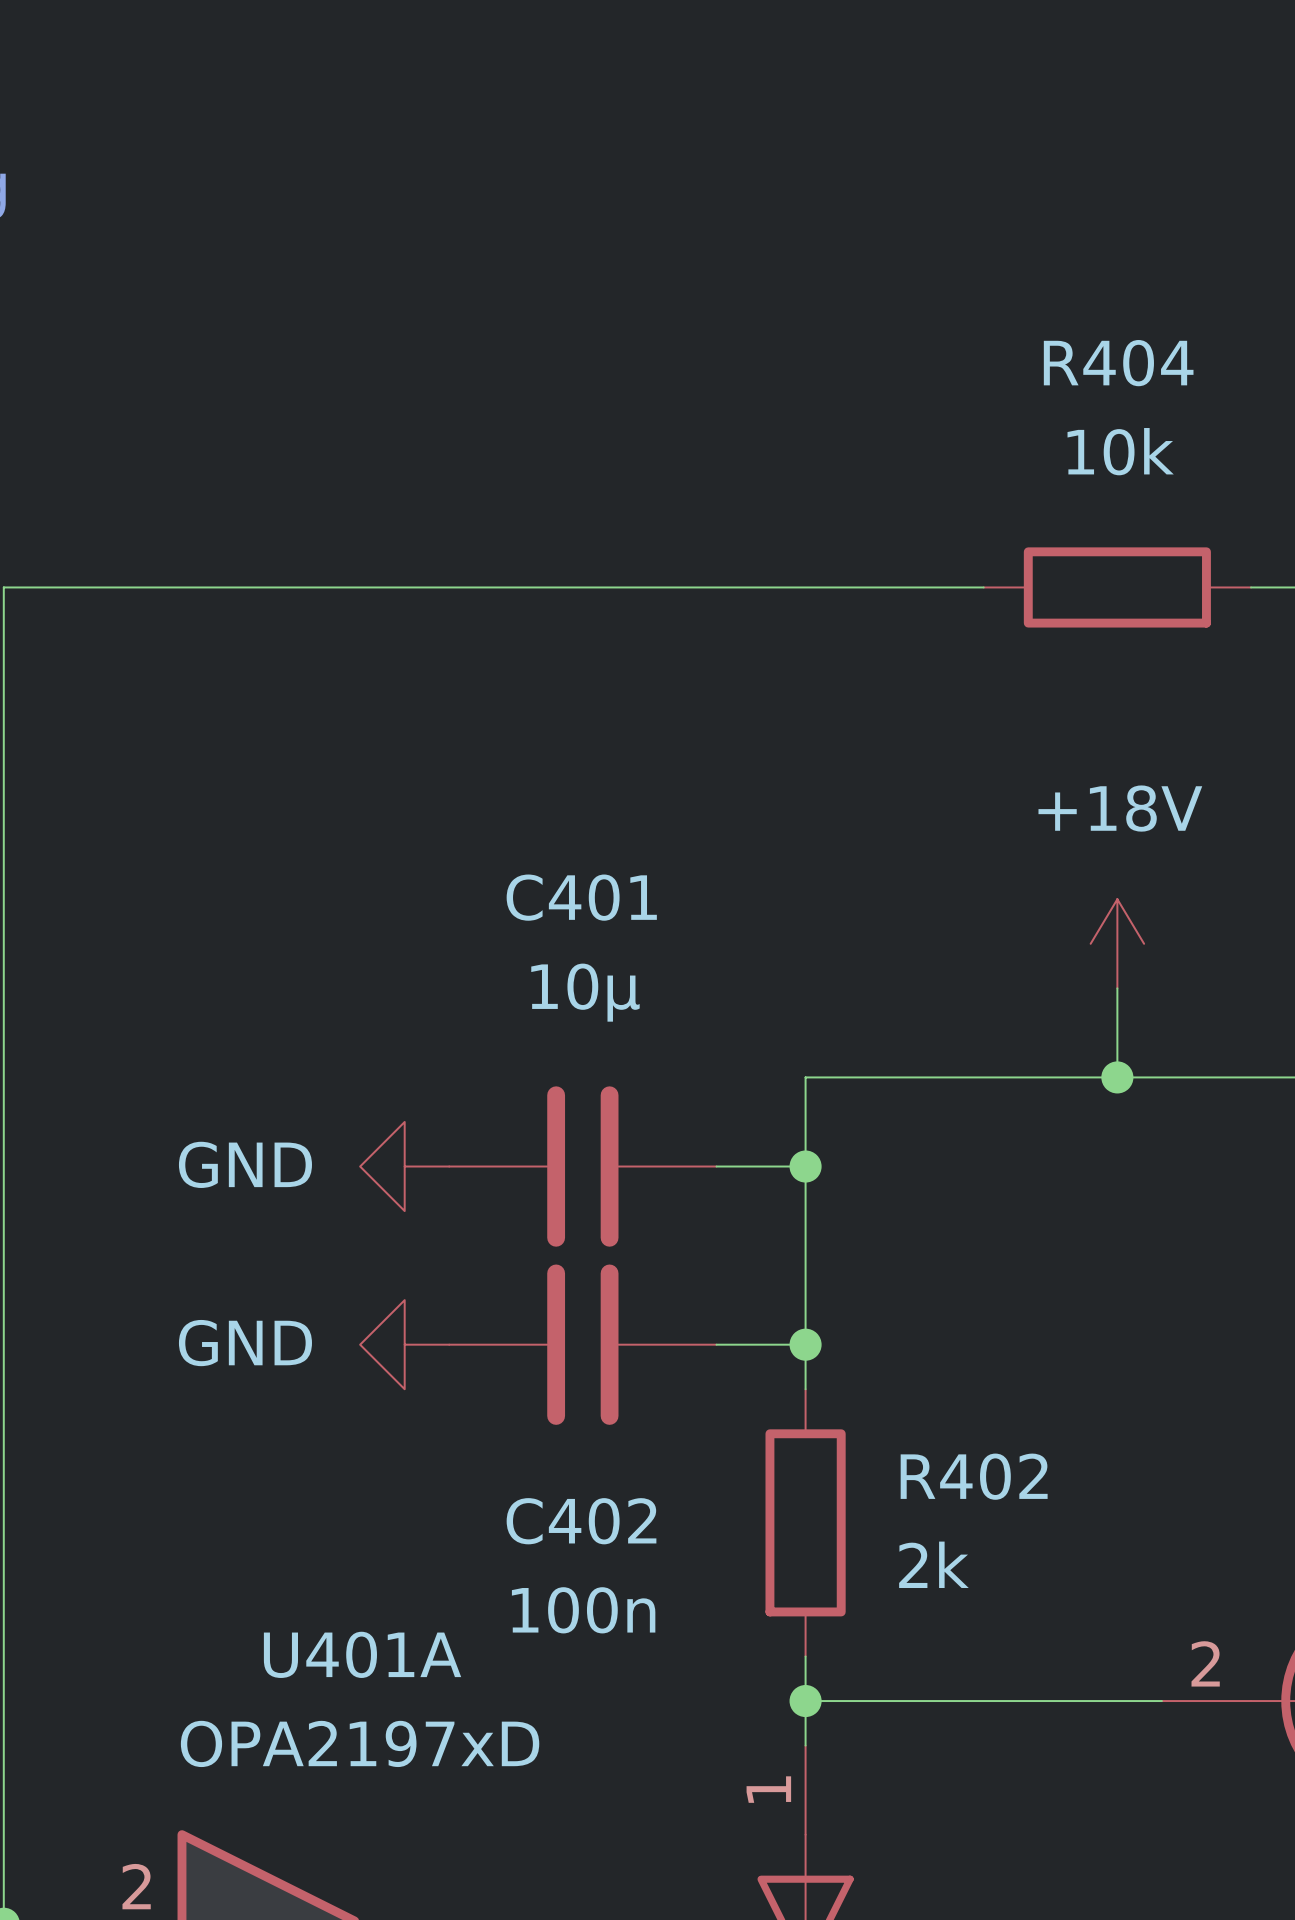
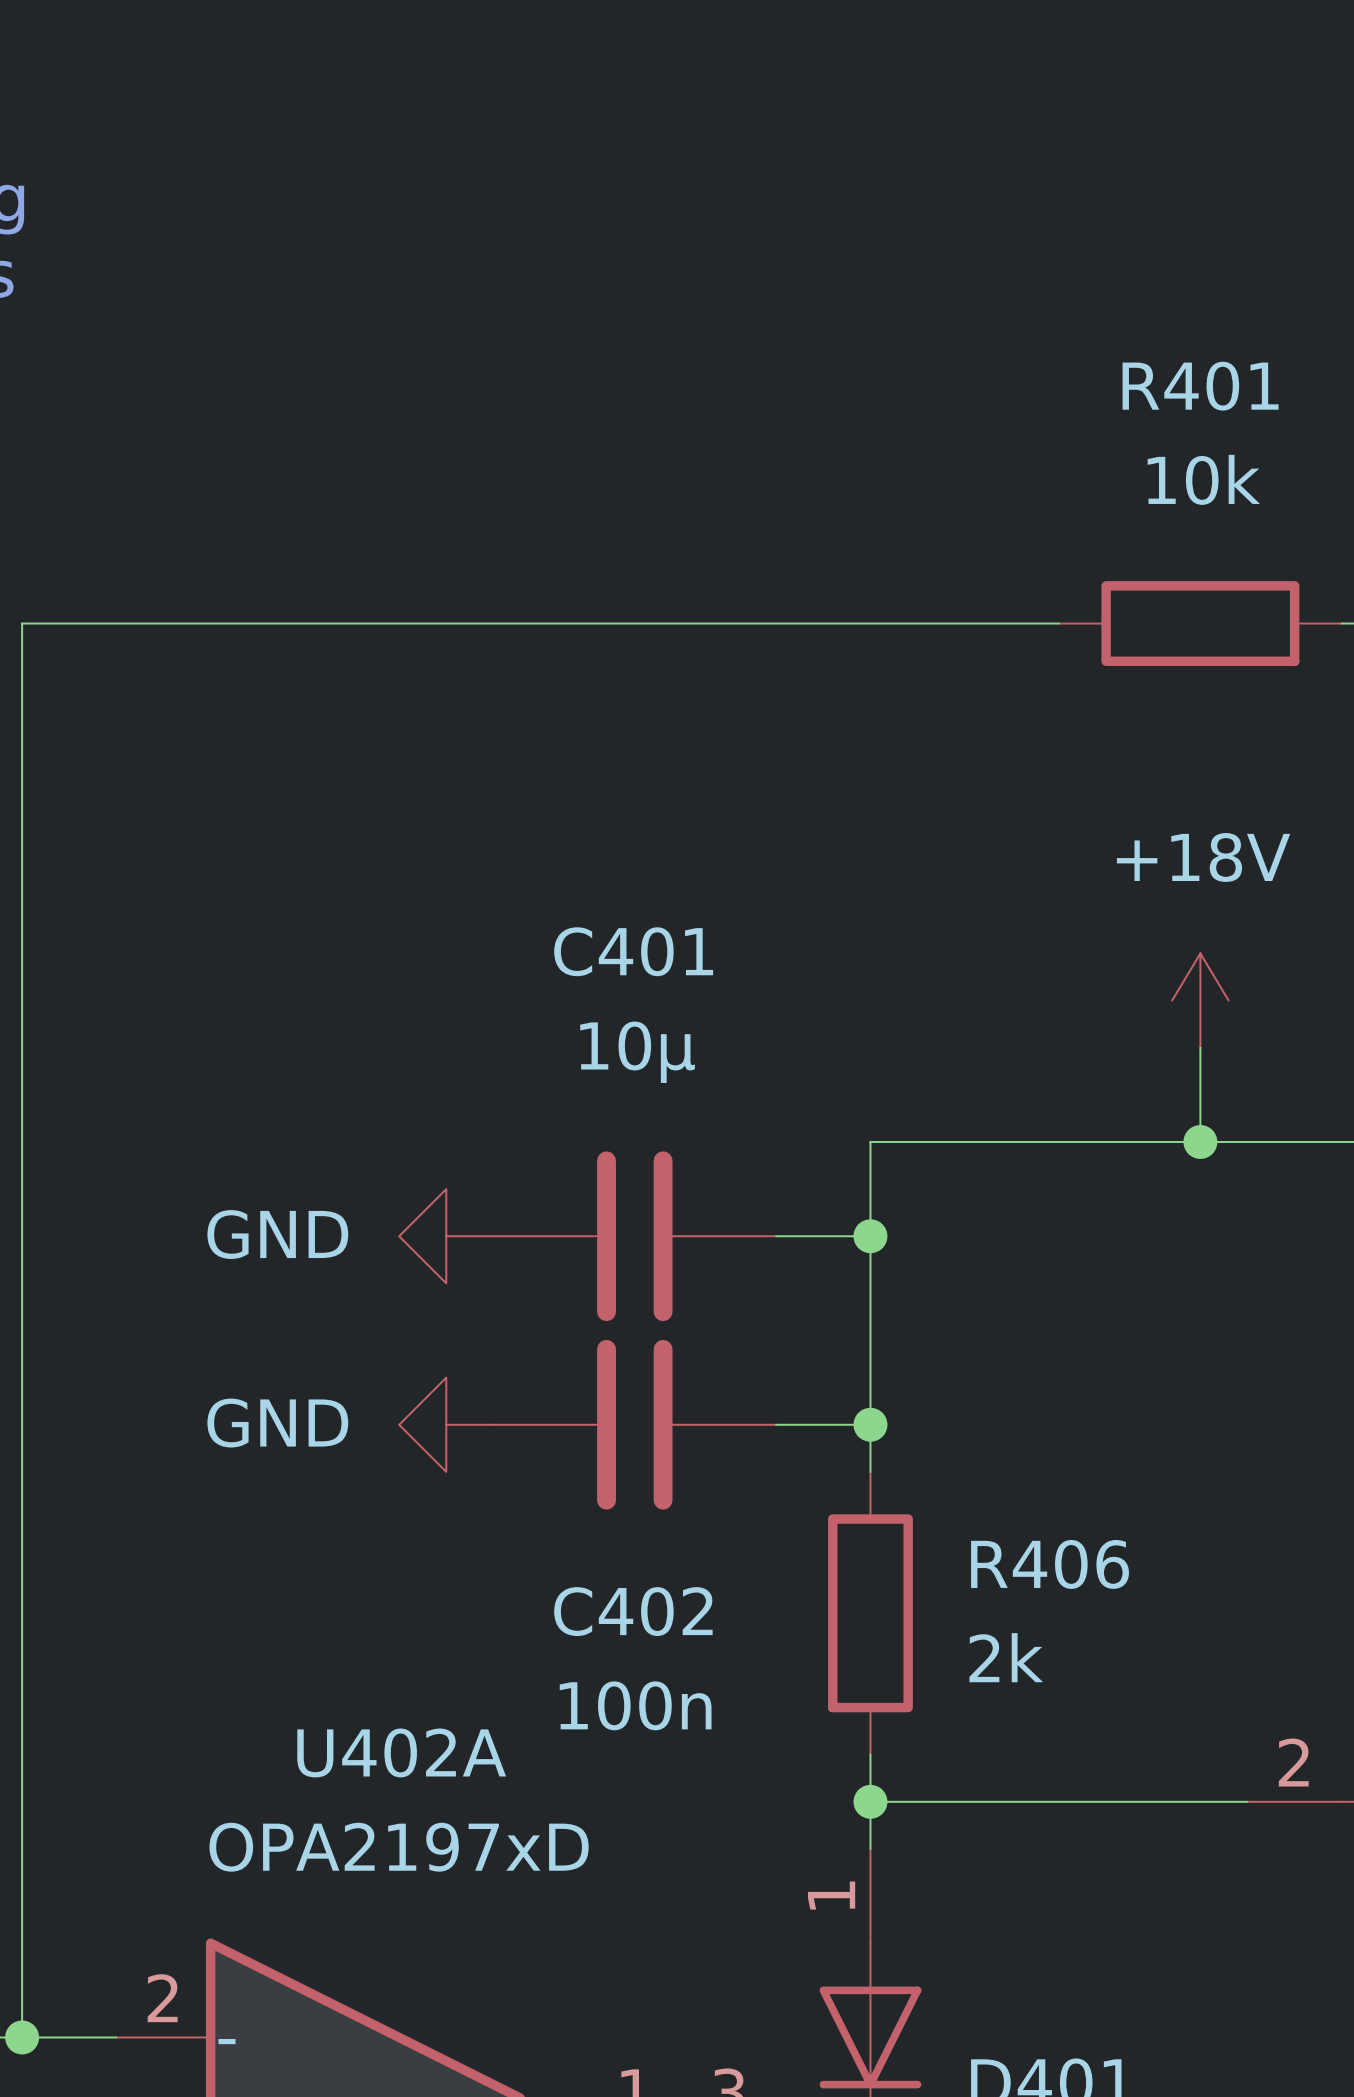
R404 name: R404 (1118, 363) -> R401 (1200, 386)
R402 name: R402 (974, 1476) -> R406 (1050, 1564)
U401A name: U401A (362, 1654) -> U402A (401, 1752)

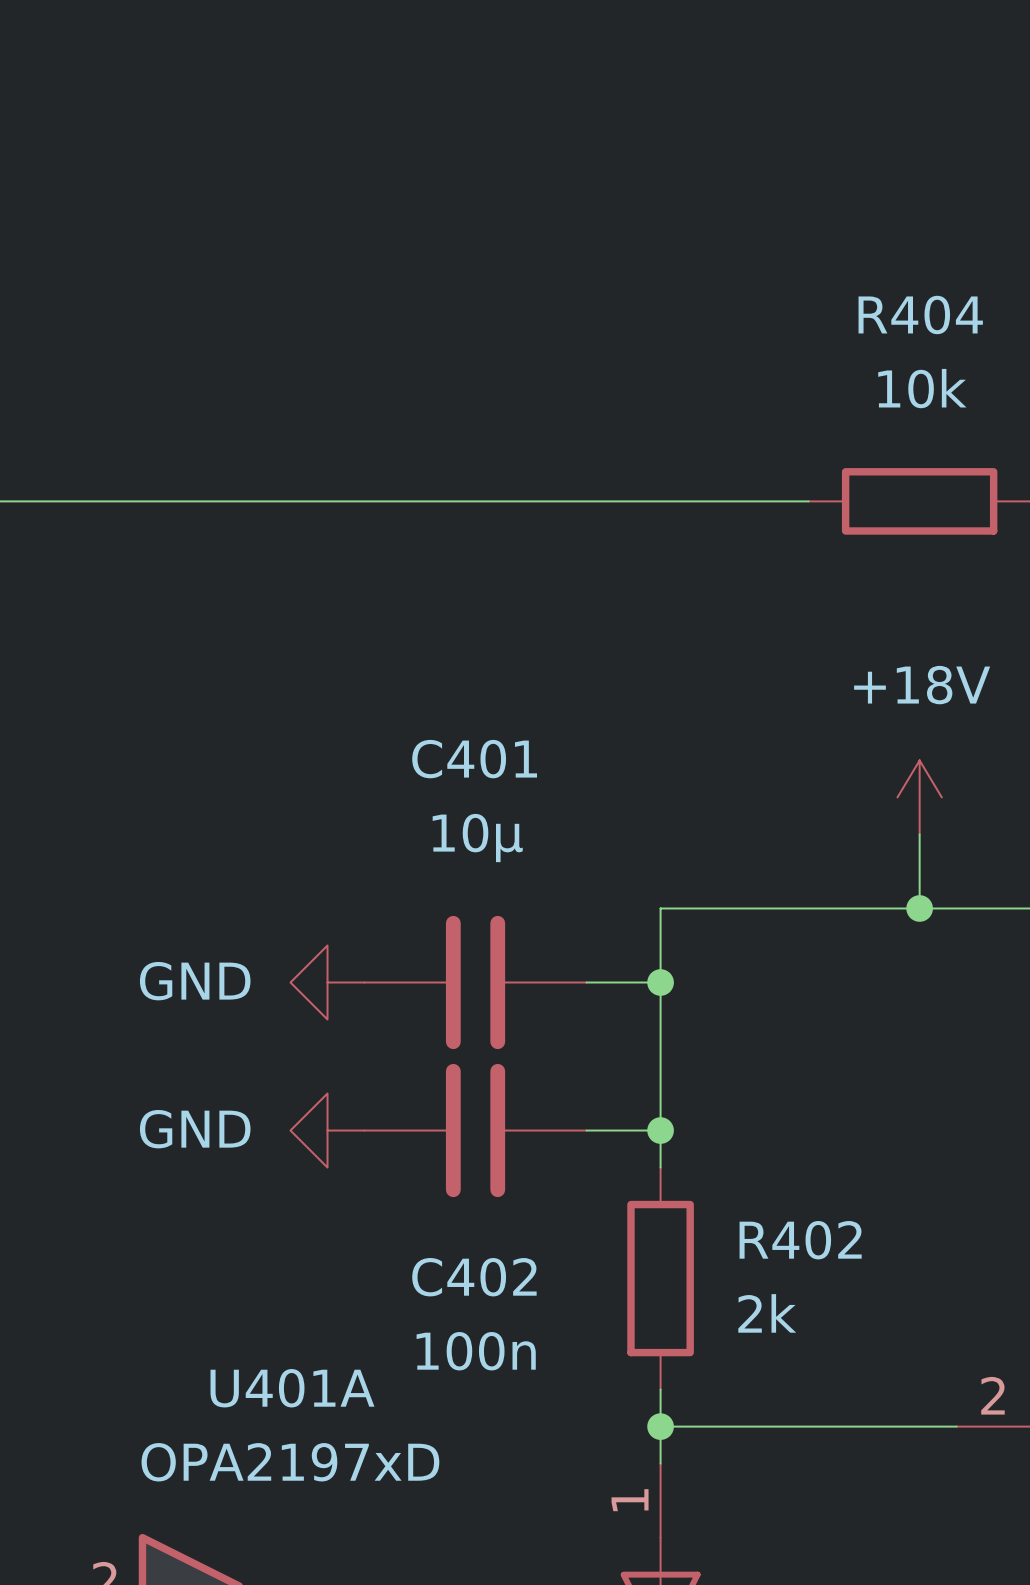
R401 name: R401 (1200, 386) -> R404 (920, 314)
R406 name: R406 (1050, 1564) -> R402 (800, 1240)
U402A name: U402A (401, 1752) -> U401A (292, 1388)

